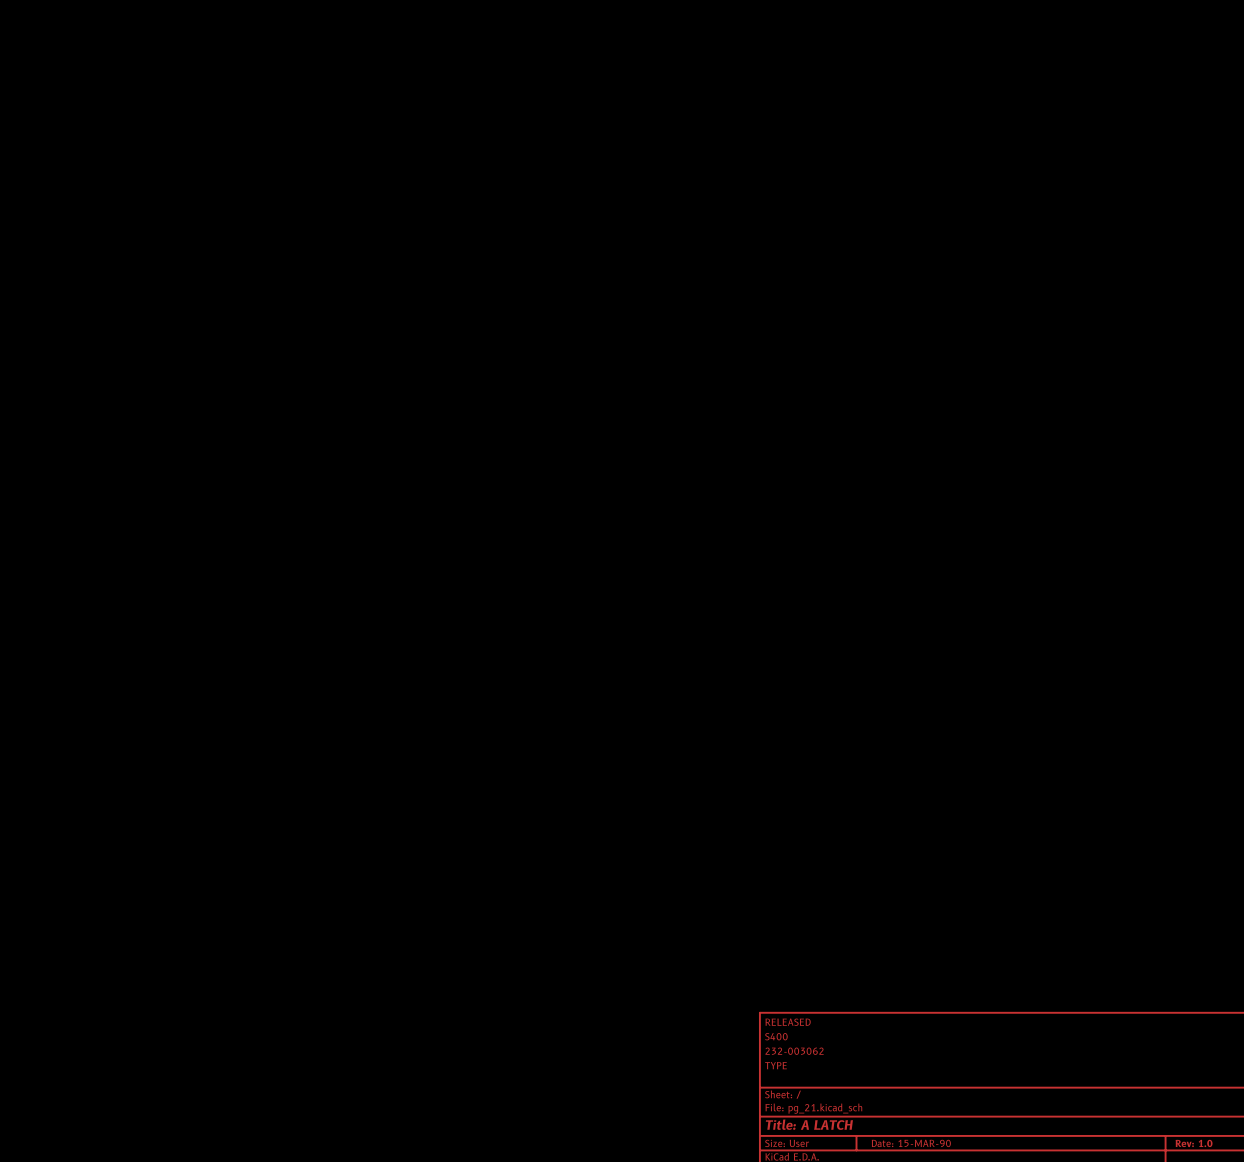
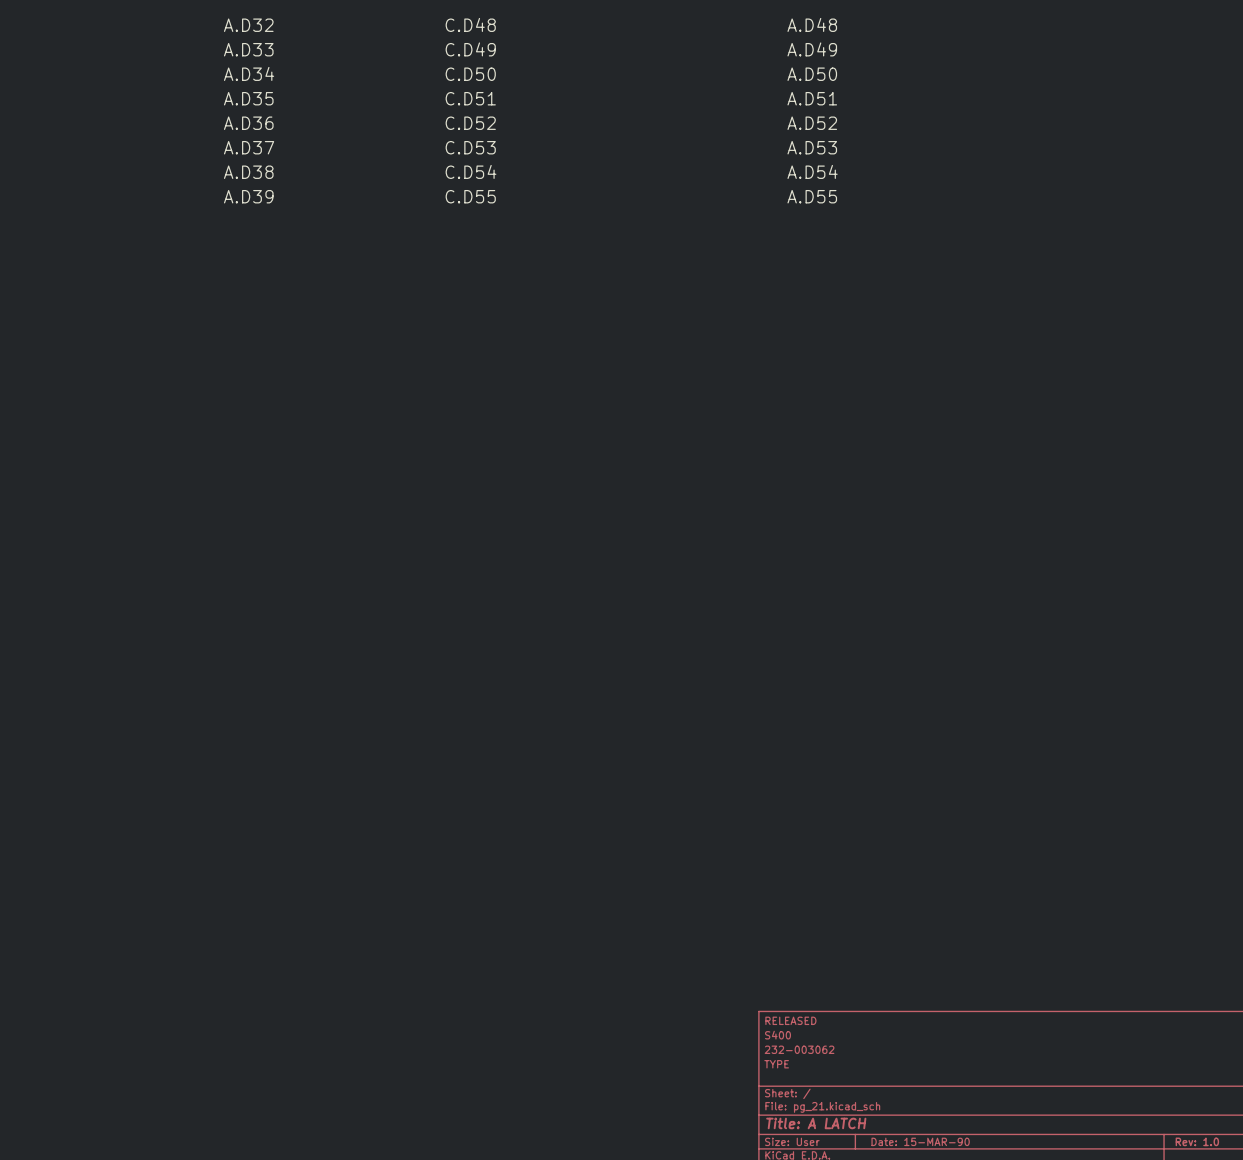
label: none -> A.D32 (248, 25)
label: none -> C.D48 (470, 24)
label: none -> A.D48 (812, 24)
label: none -> A.D33 (248, 49)
label: none -> C.D49 (470, 49)
label: none -> A.D49 (812, 49)
label: none -> A.D34 (249, 73)
label: none -> C.D50 (470, 74)
label: none -> A.D50 (812, 74)
label: none -> A.D35 (248, 98)
label: none -> C.D51 (470, 98)
label: none -> A.D51 (812, 98)
label: none -> A.D36 (248, 123)
label: none -> C.D52 (470, 123)
label: none -> A.D52 (812, 123)
label: none -> A.D37 (249, 147)
label: none -> C.D53 (470, 147)
label: none -> A.D53 (812, 147)
label: none -> A.D38 (248, 172)
label: none -> C.D54 (471, 171)
label: none -> A.D54 (812, 171)
label: none -> A.D39 (248, 196)
label: none -> C.D55 (470, 196)
label: none -> A.D55 (812, 196)

